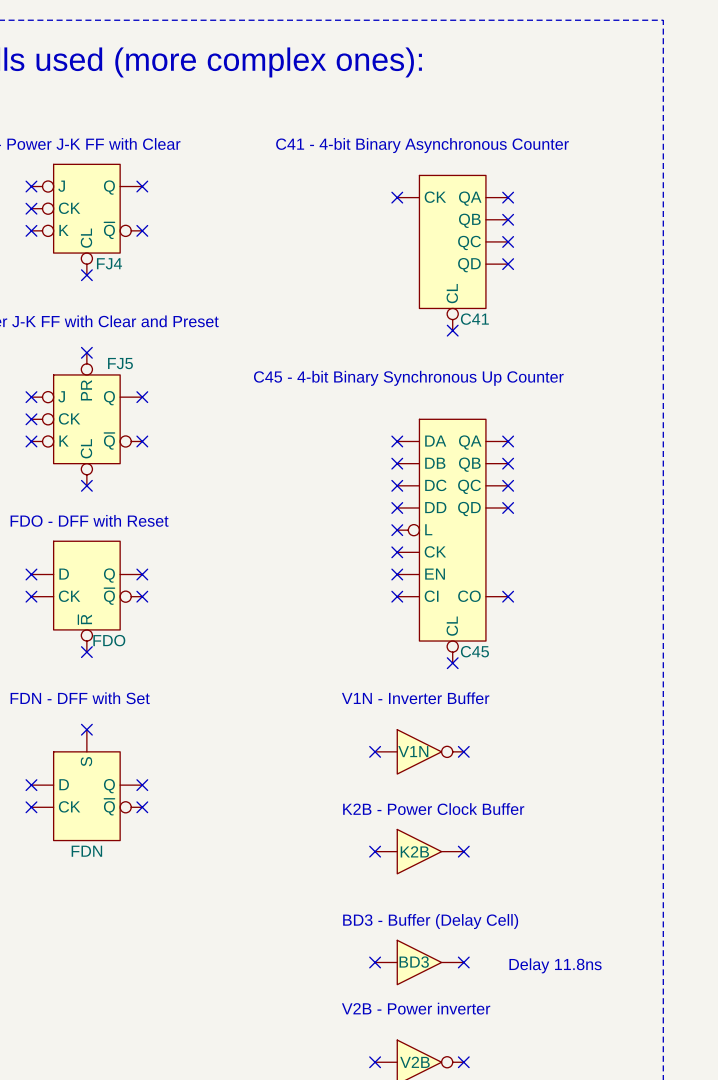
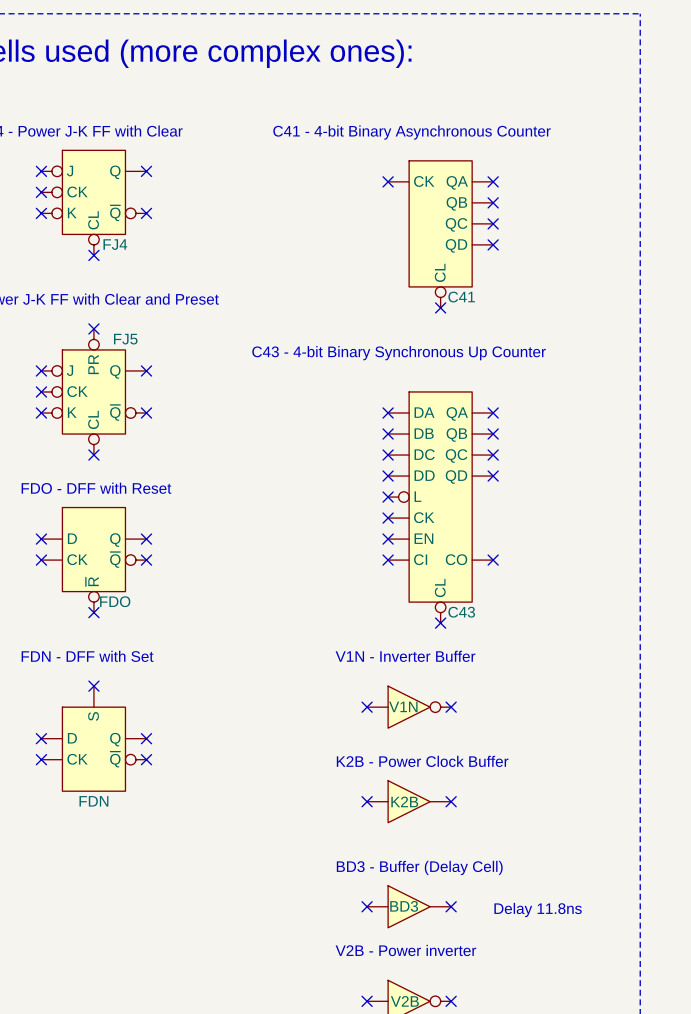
text: C45 - 4-bit Binary Synchronous Up Counter (408, 378) -> C43 - 4-bit Binary Synchronous Up Counter (399, 353)
part value: C45 (474, 651) -> C43 (461, 612)

